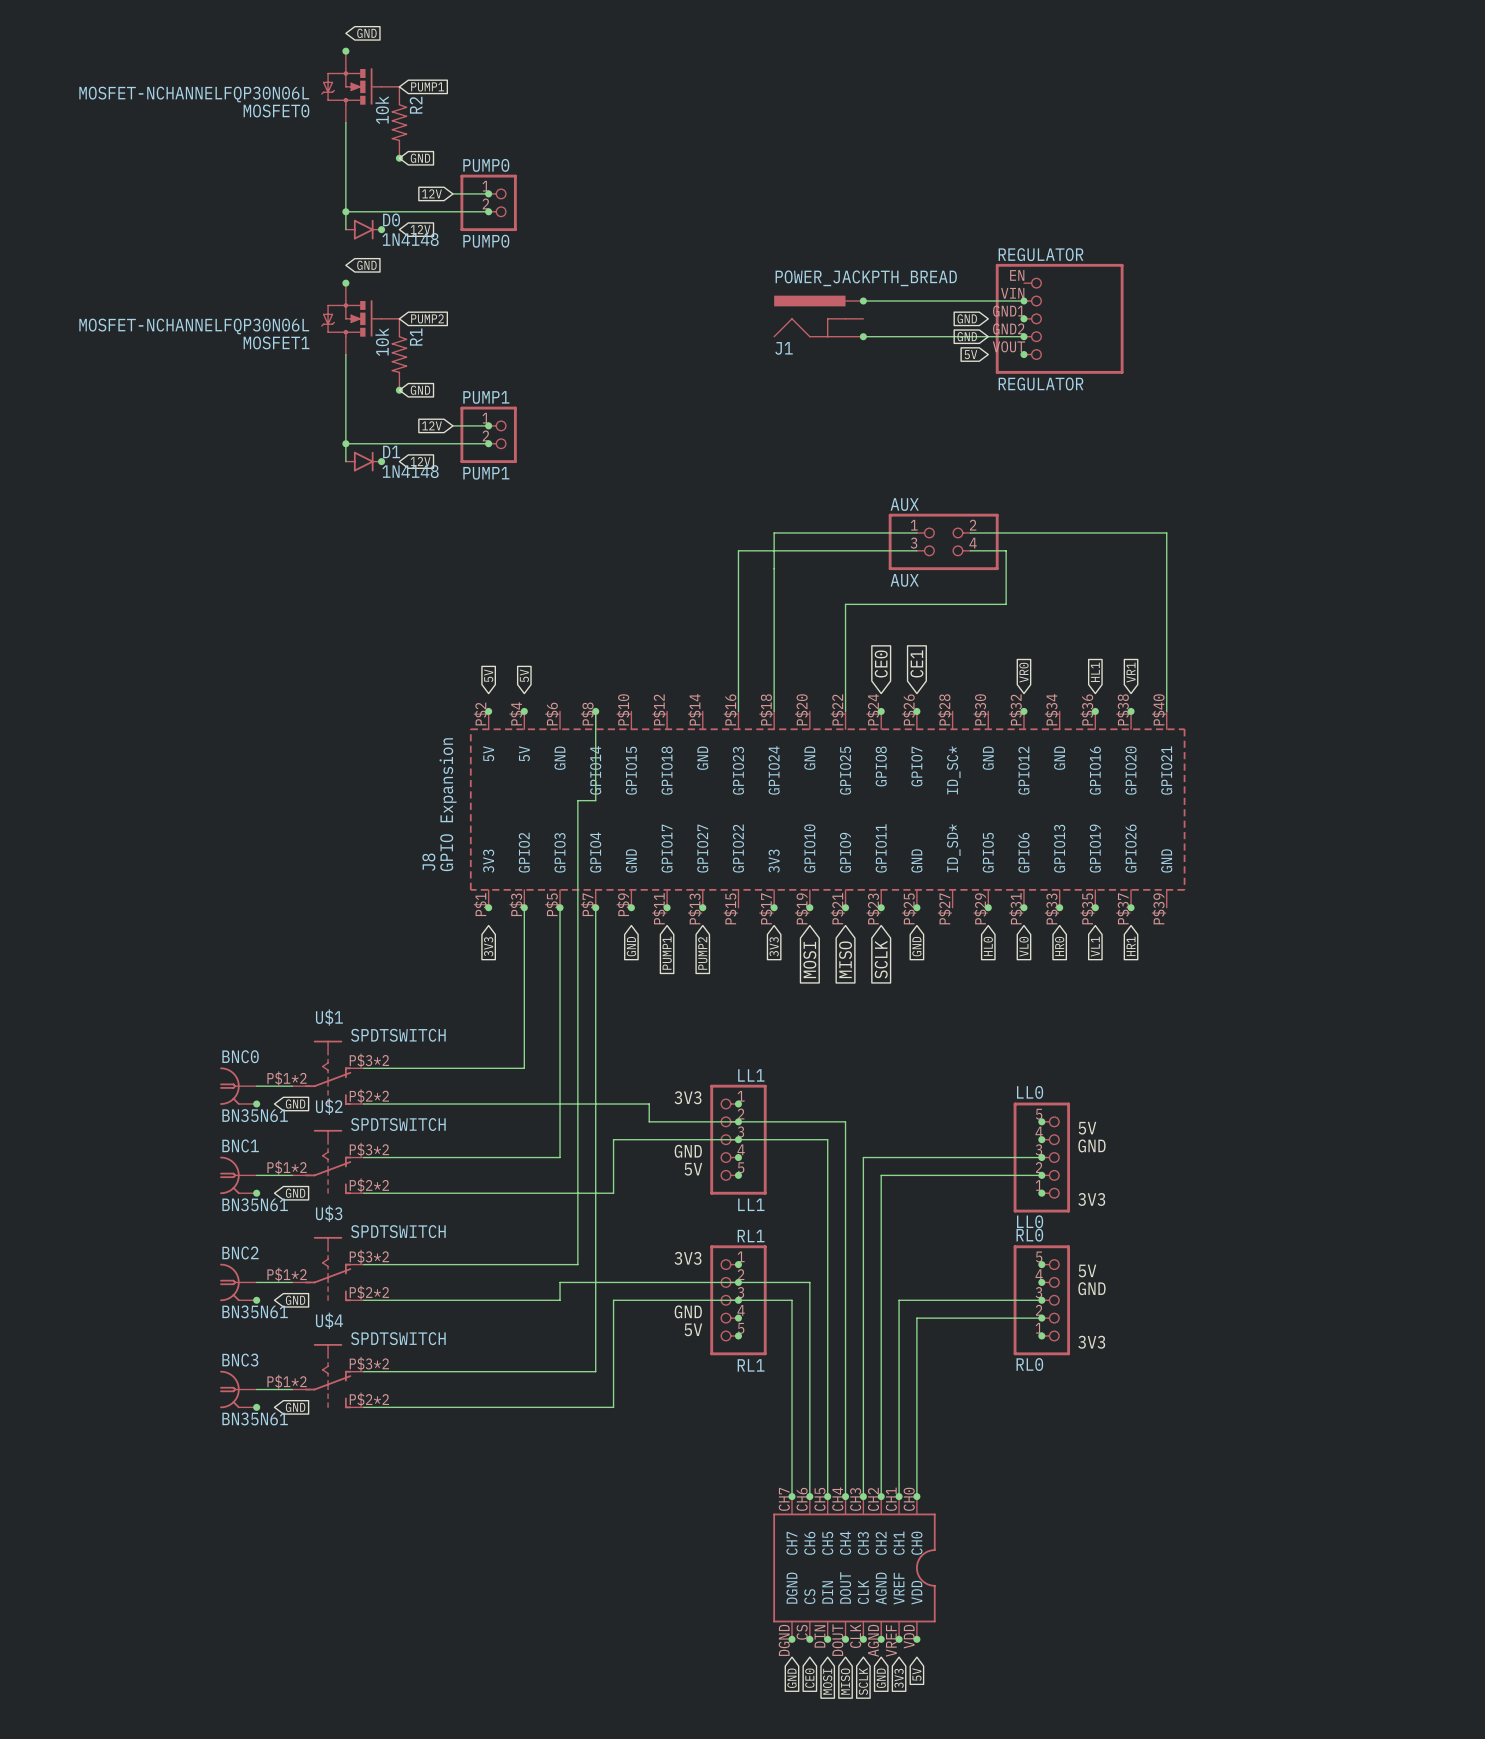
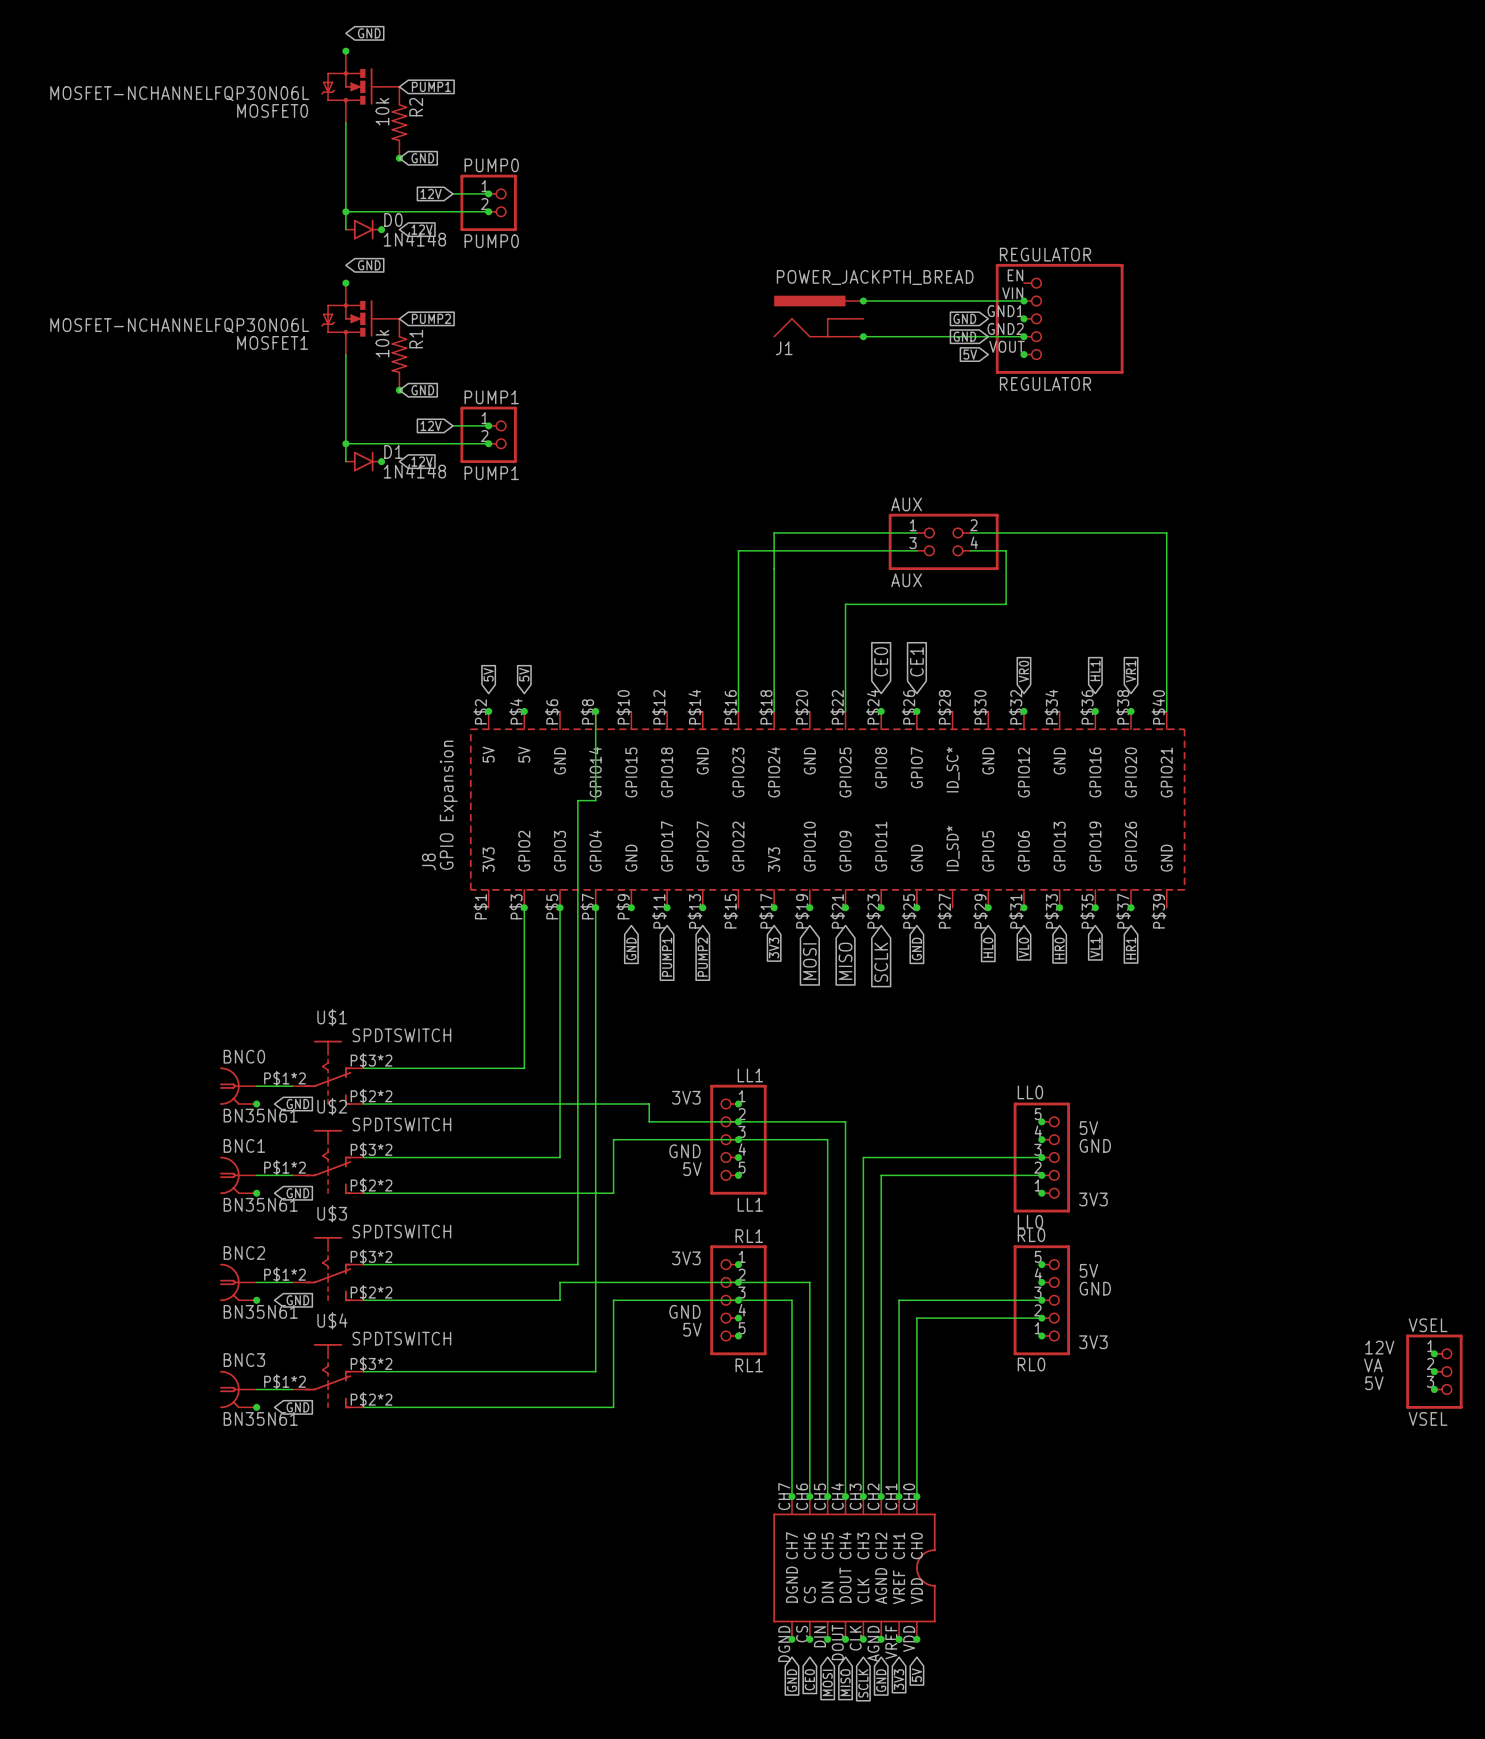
junction: (488, 907) -> none
global label: 3V3 (488, 946) -> none
label: none -> 12V (1379, 1347)
junction: none -> (1434, 1353)
label: none -> VA (1373, 1365)
junction: none -> (1434, 1371)
VSEL: none -> VSEL (1434, 1371)
label: none -> 5V (1374, 1383)
junction: none -> (1434, 1389)

